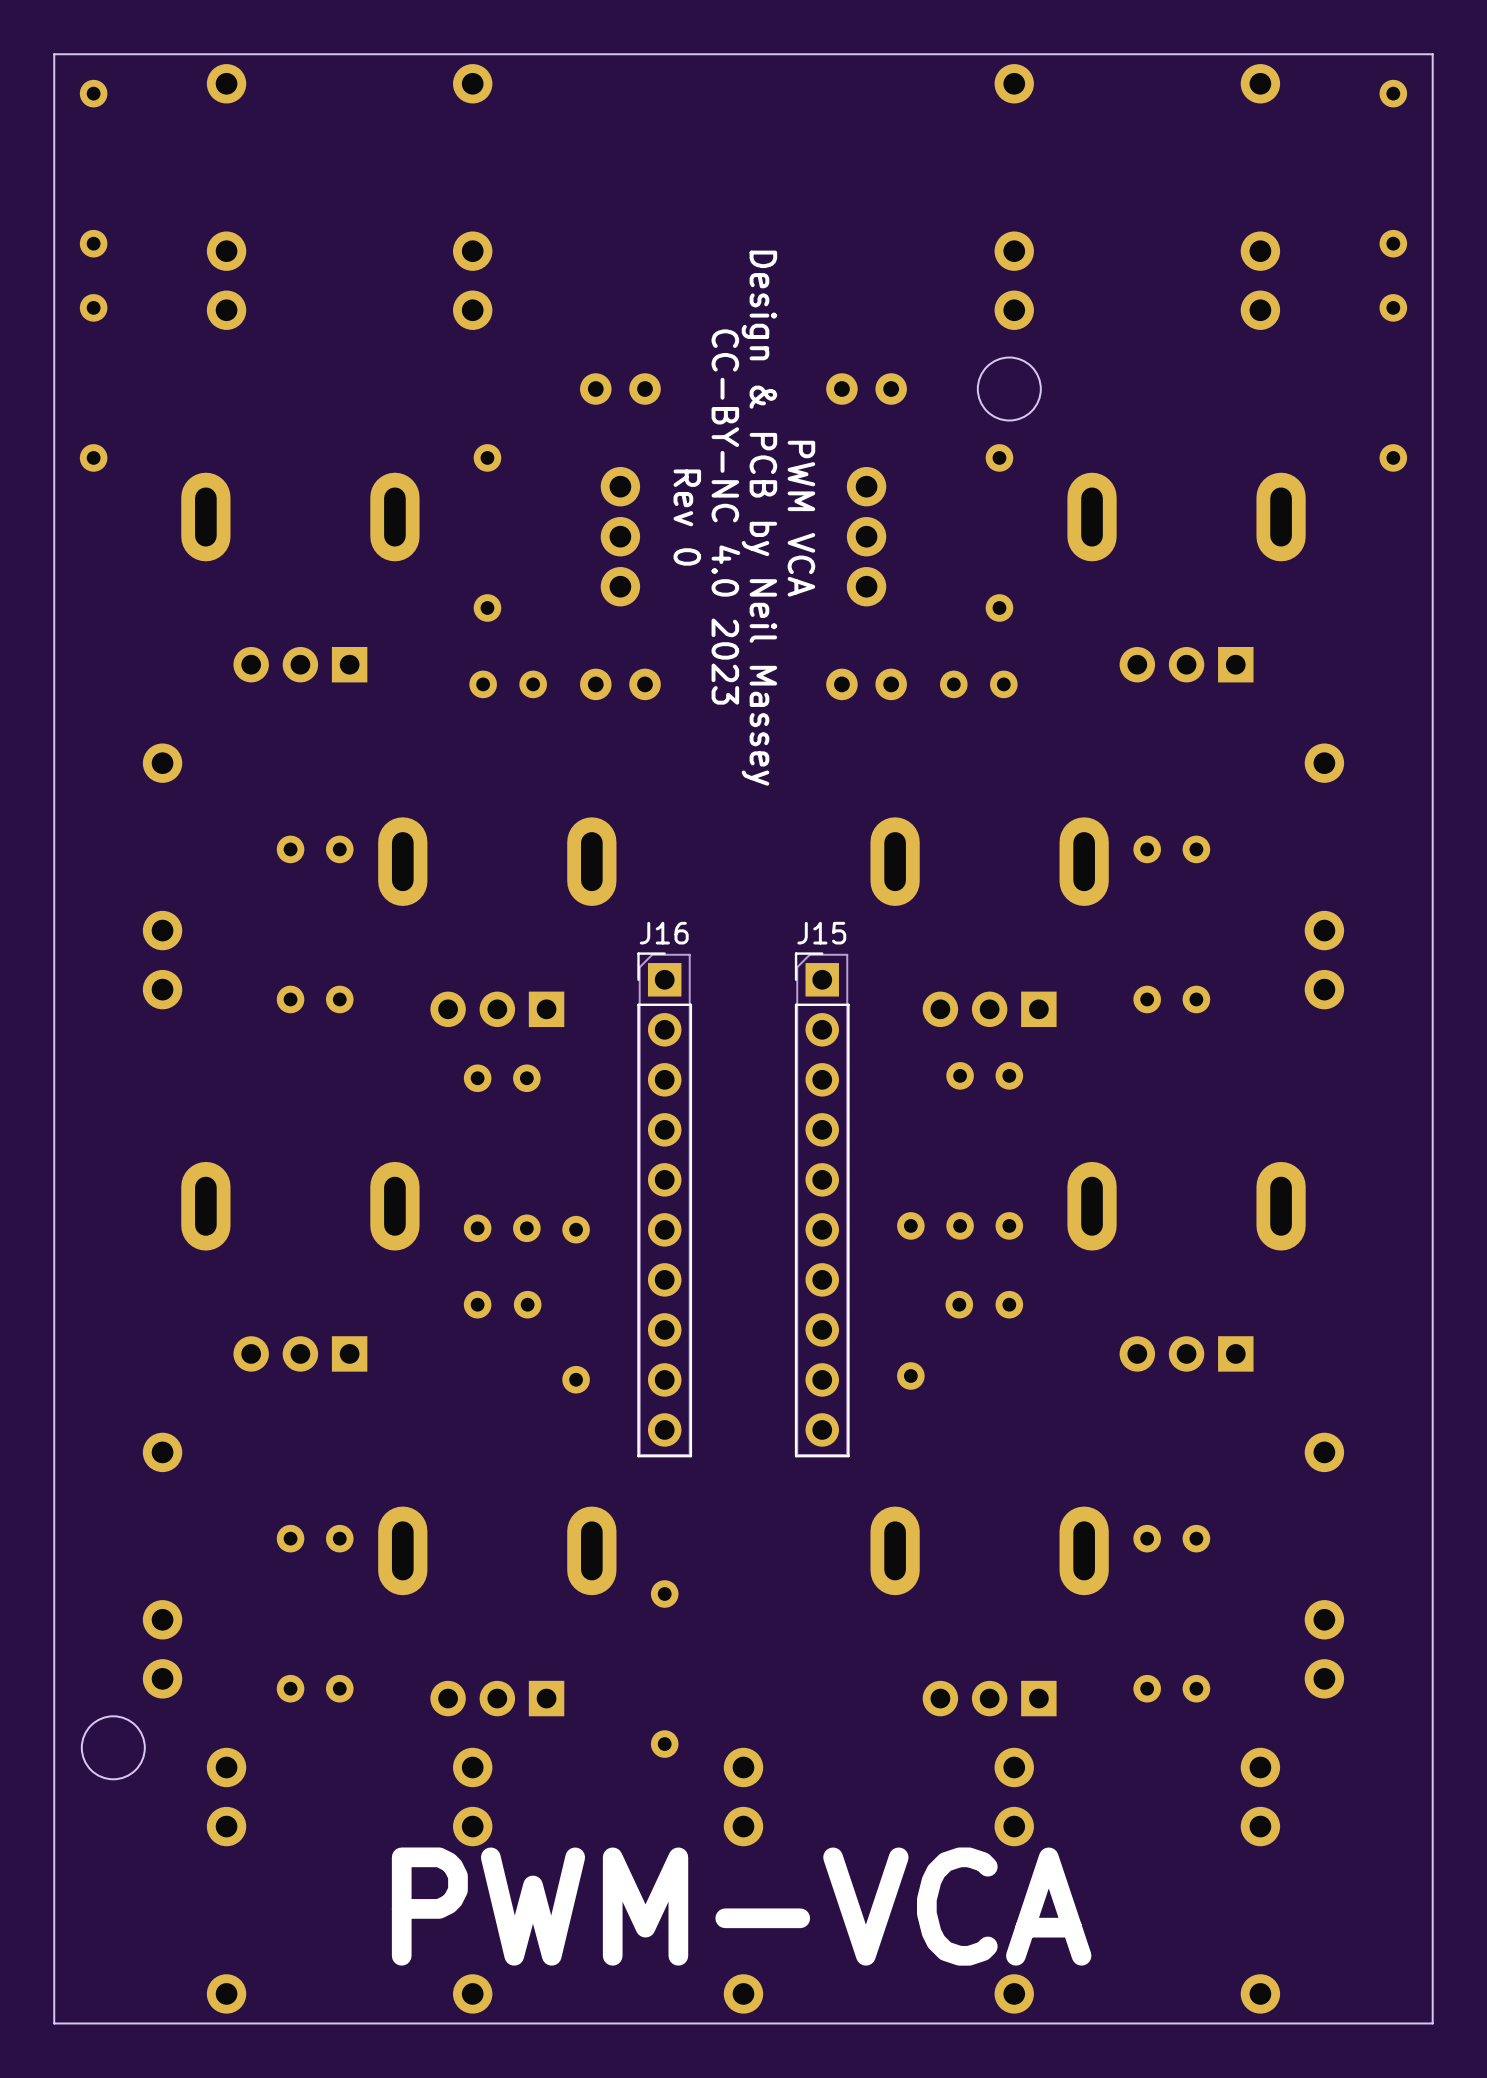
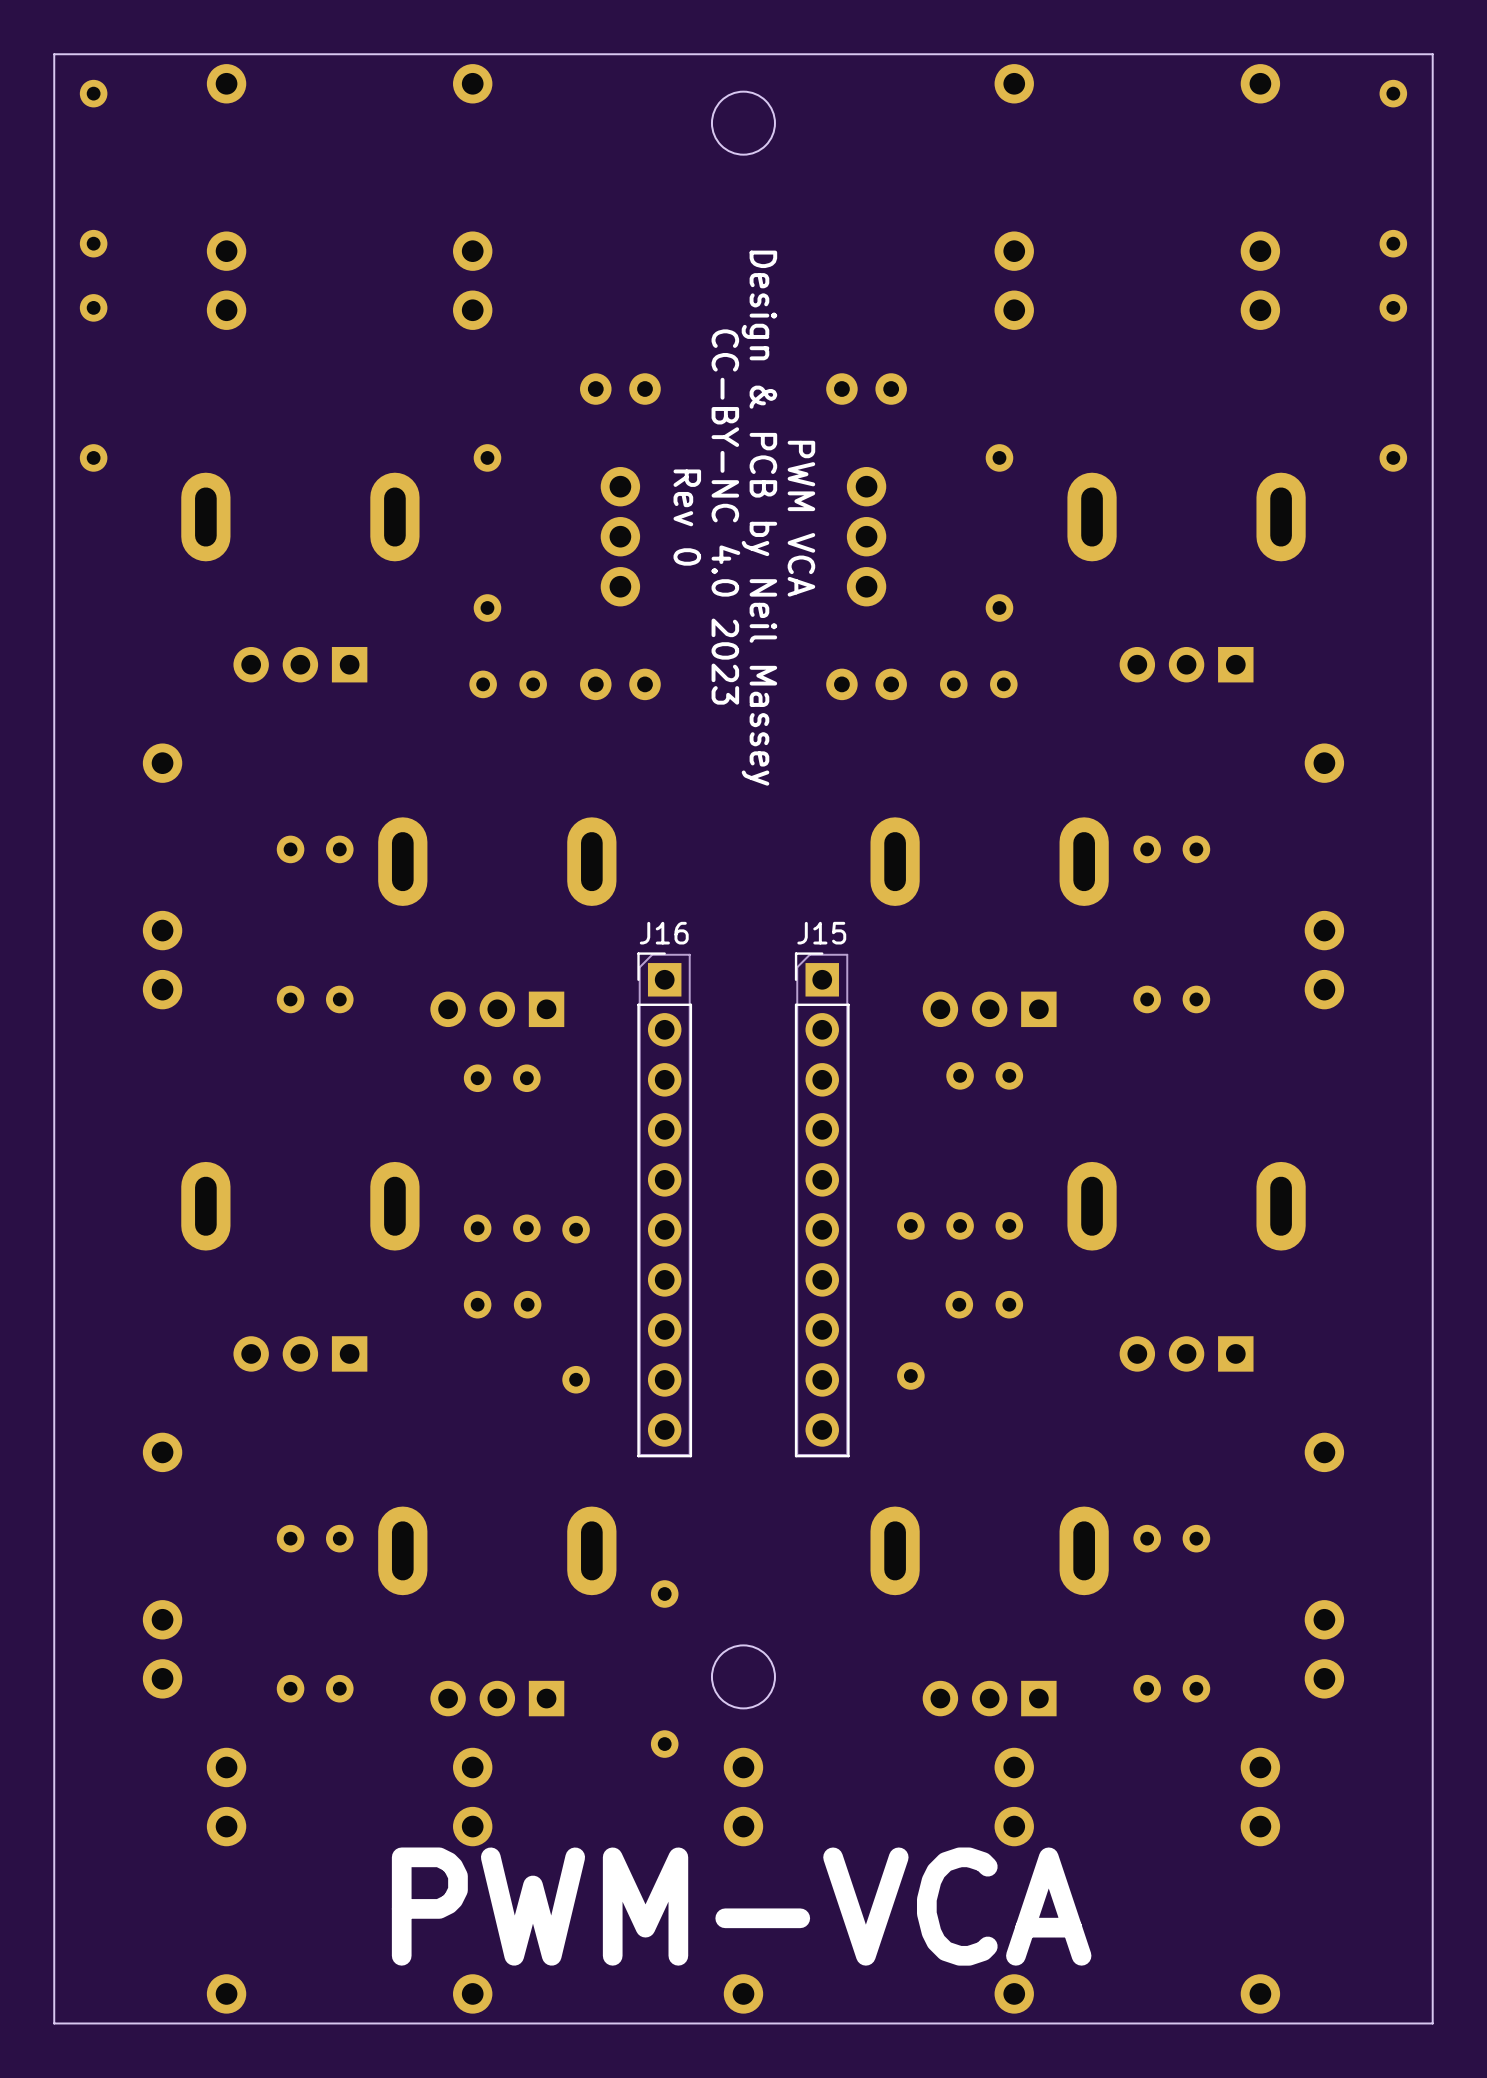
round board edge position: (1009, 389) -> (743, 123)
round board edge: none -> [710, 1644, 776, 1710]
round board edge: [80, 1715, 146, 1781] -> none

